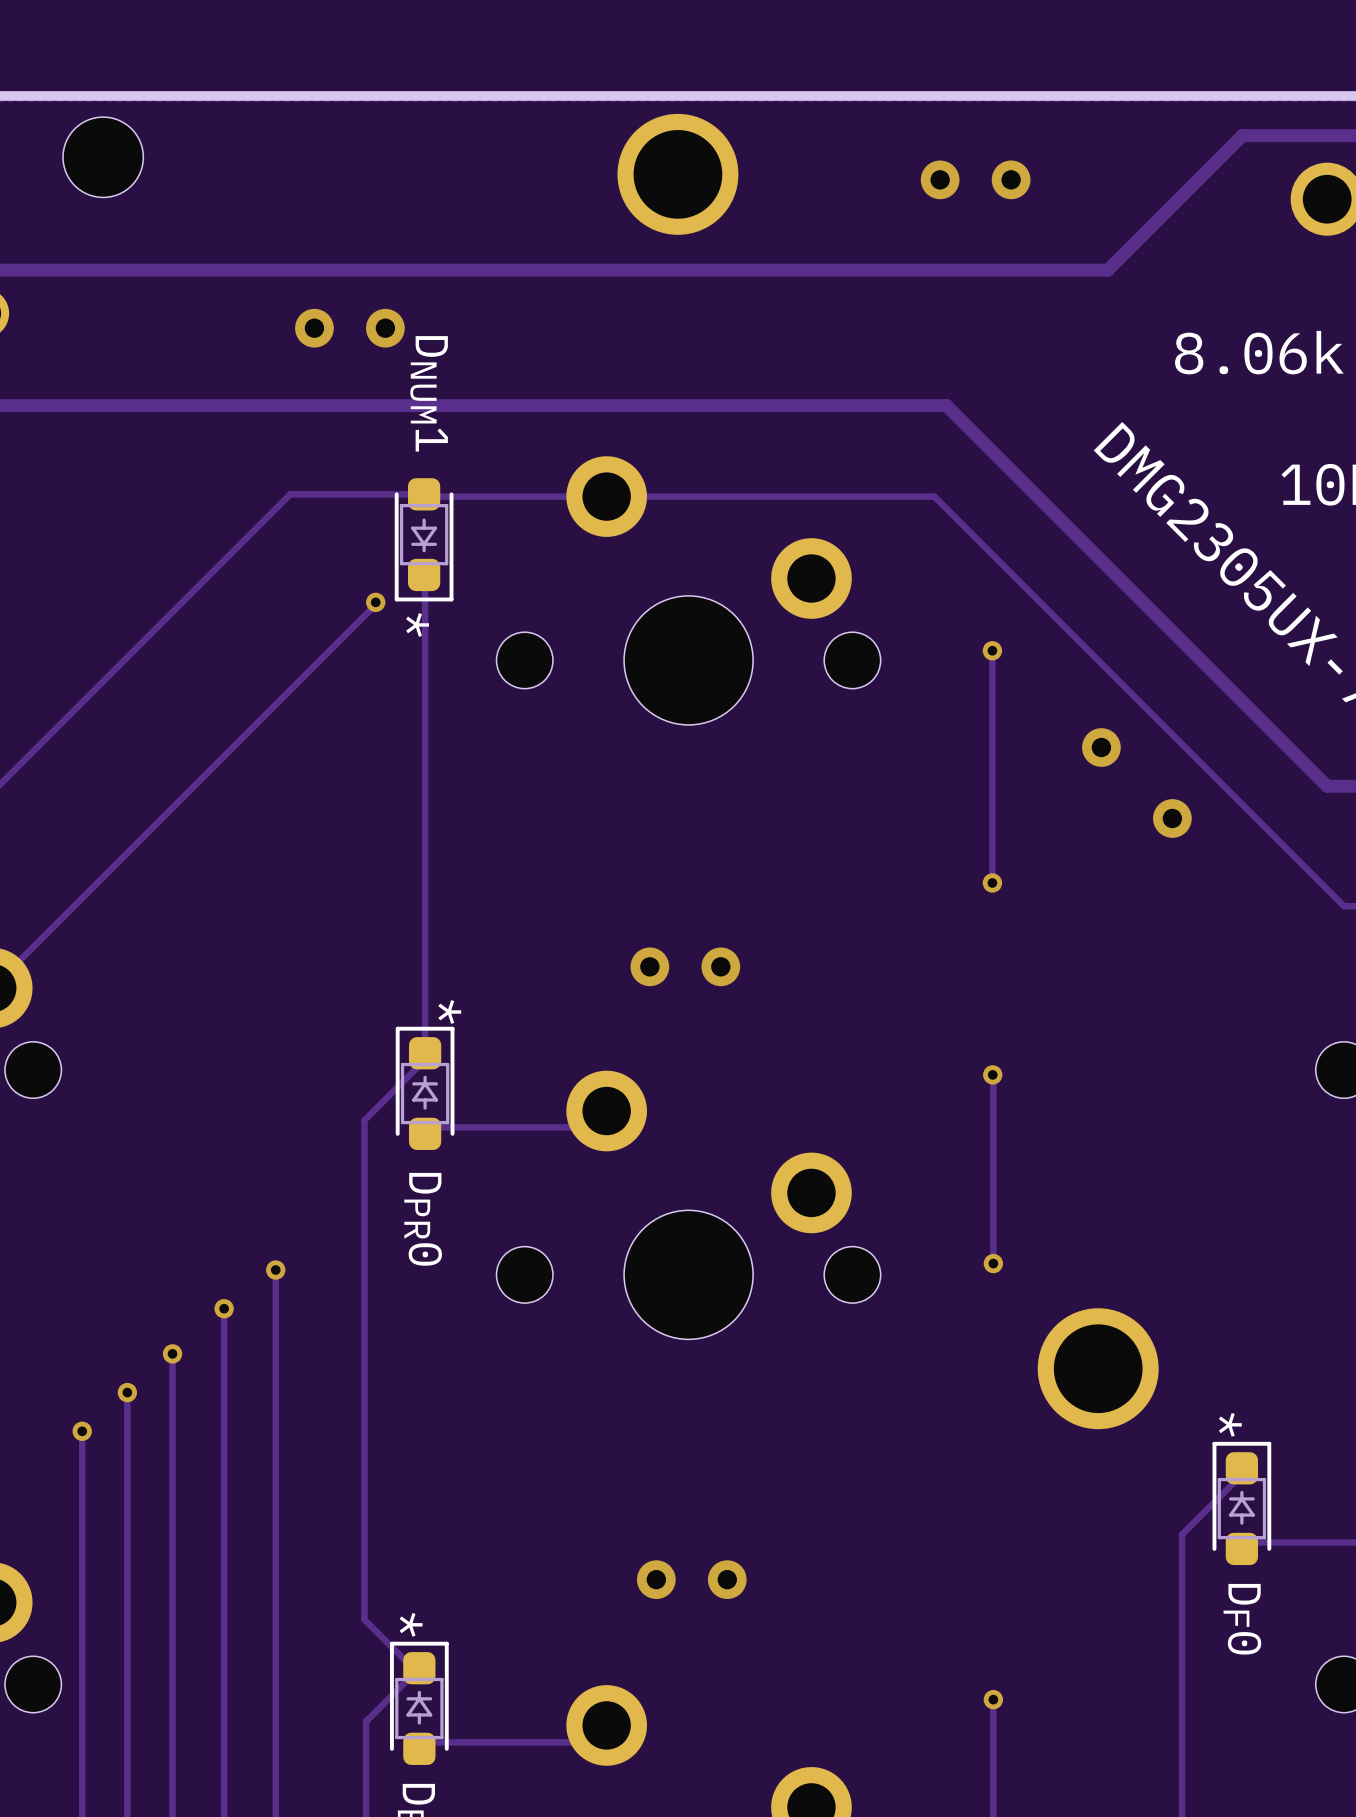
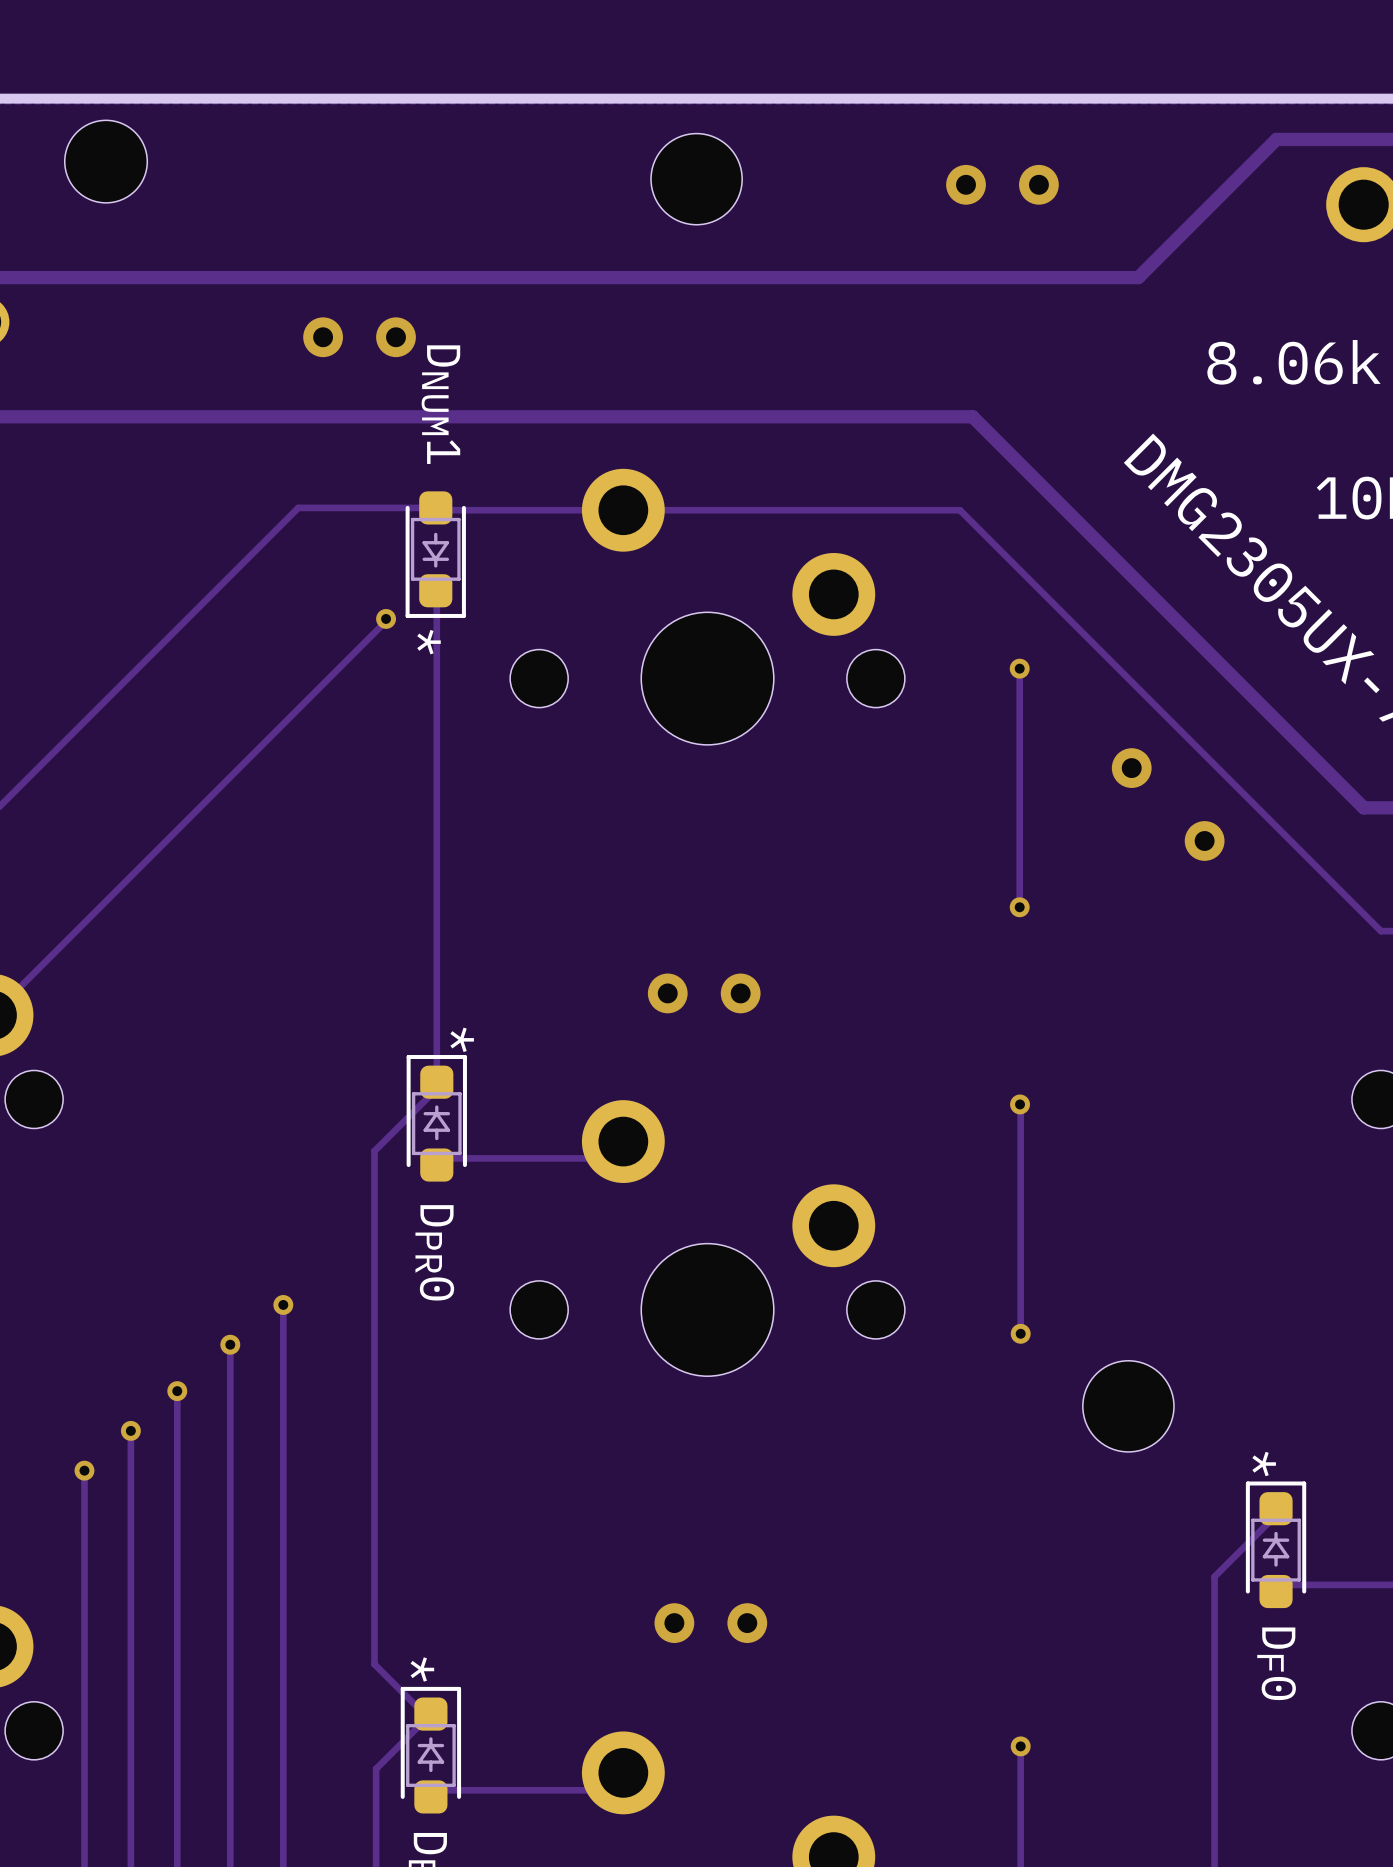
part footprint: [617, 113, 739, 235] -> [651, 133, 743, 225]
track: none -> (1020, 1298) (1020, 1333)
via position: (993, 1263) -> (1020, 1333)
part footprint: [1037, 1308, 1159, 1430] -> [1082, 1360, 1174, 1452]

